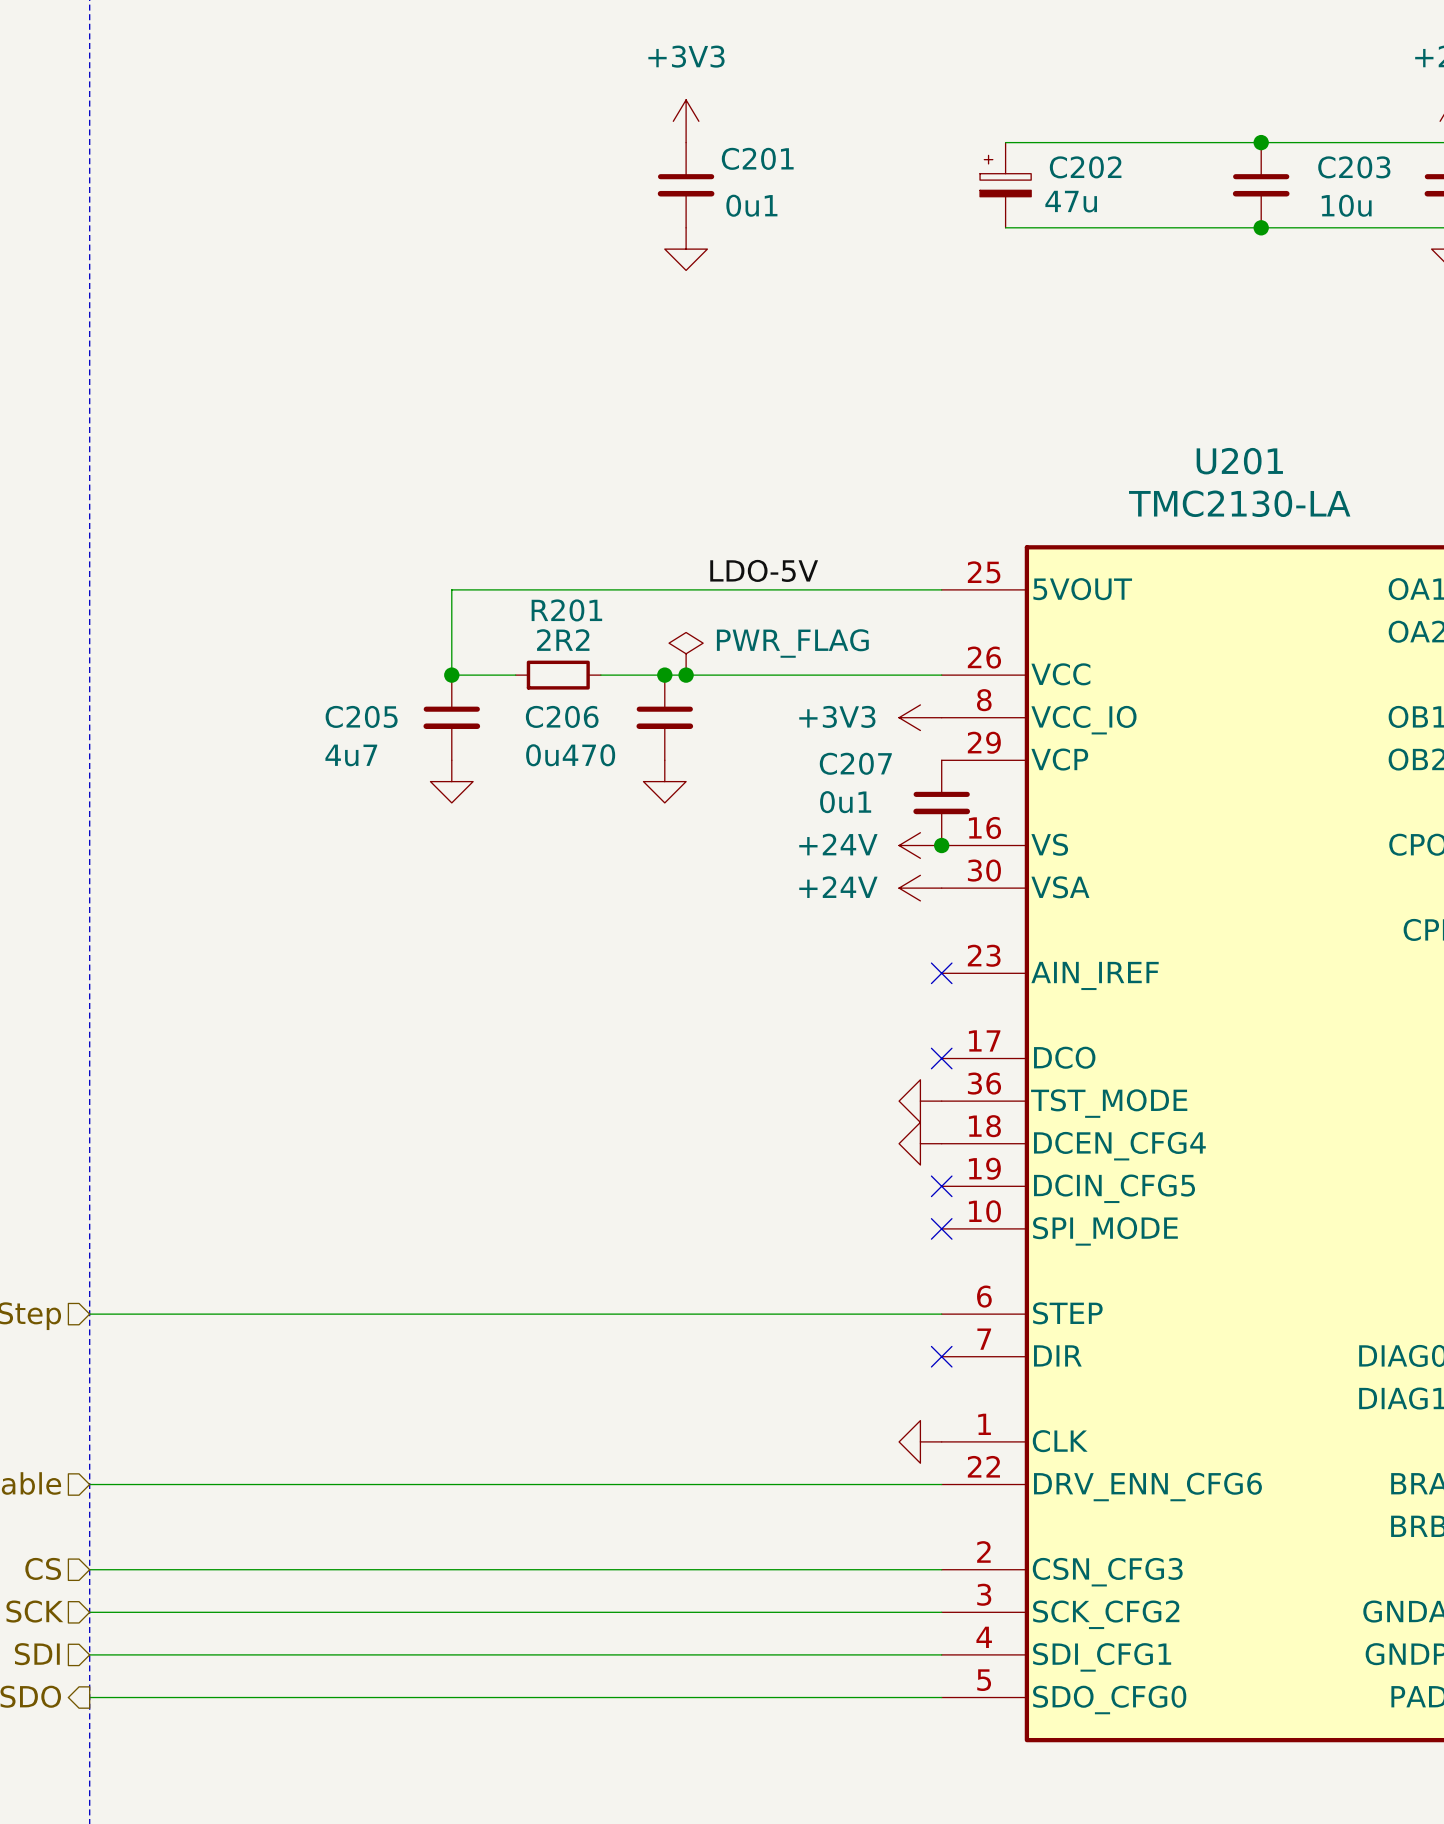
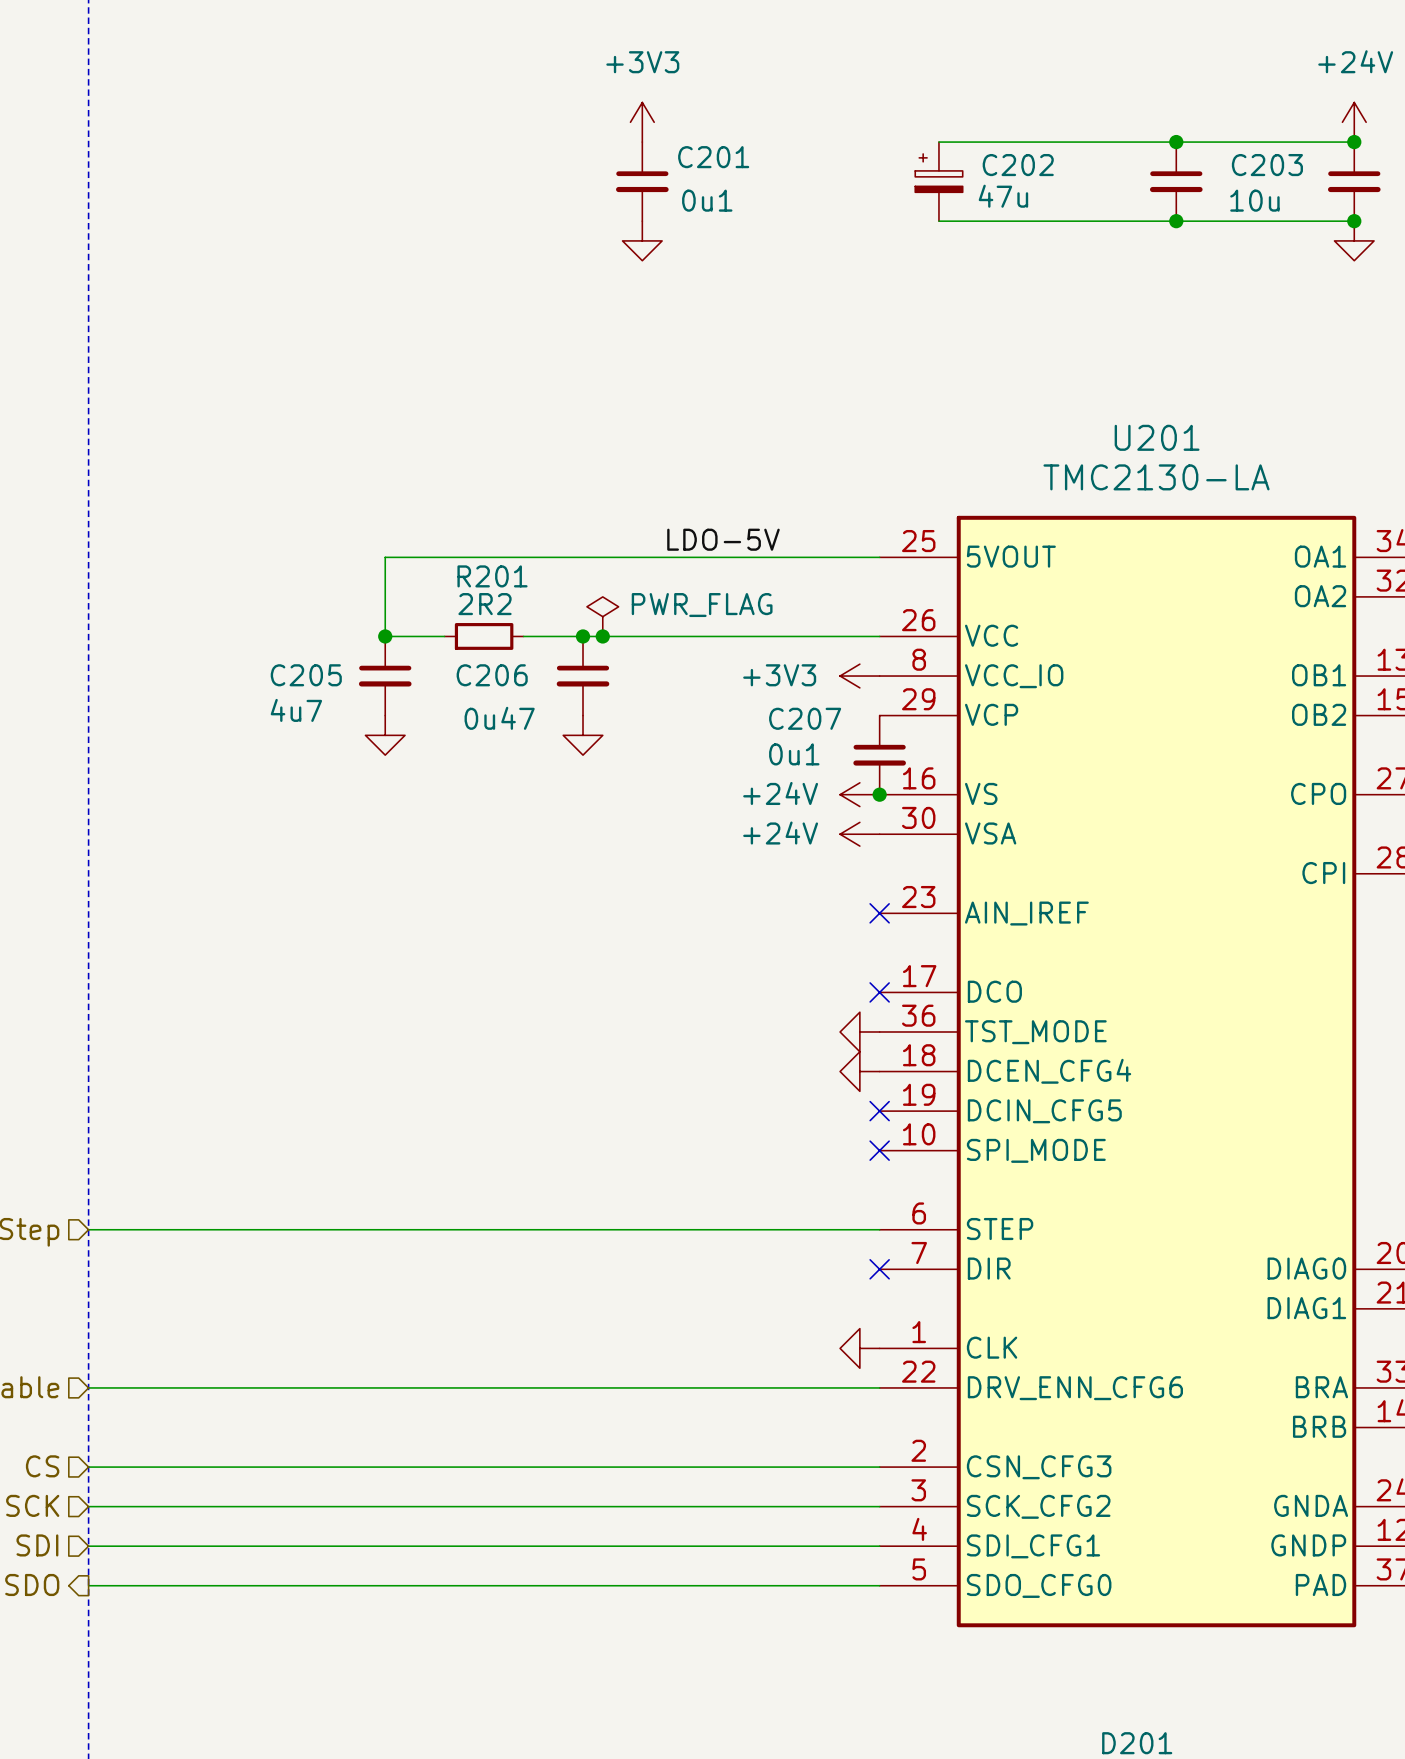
wire: (451, 589) (451, 675) -> (424, 557) (385, 557) (385, 636) (424, 636)
power symbol position: PWR_FLAG (686, 653) -> PWR_FLAG (602, 616)
junction position: (451, 675) -> (385, 636)
wire: (473, 675) (515, 675) -> (523, 636) (563, 636)
R201 position: (558, 675) -> (484, 636)
junction: none -> (583, 636)
junction: none -> (602, 636)
junction: (664, 675) -> none
junction: (686, 675) -> none
C205 position: (451, 717) -> (385, 676)
C206 position: (664, 717) -> (583, 676)
C206 value: 0u470 (570, 755) -> 0u47 (499, 718)
power symbol position: (451, 781) -> (385, 735)
power symbol position: (664, 781) -> (583, 735)

